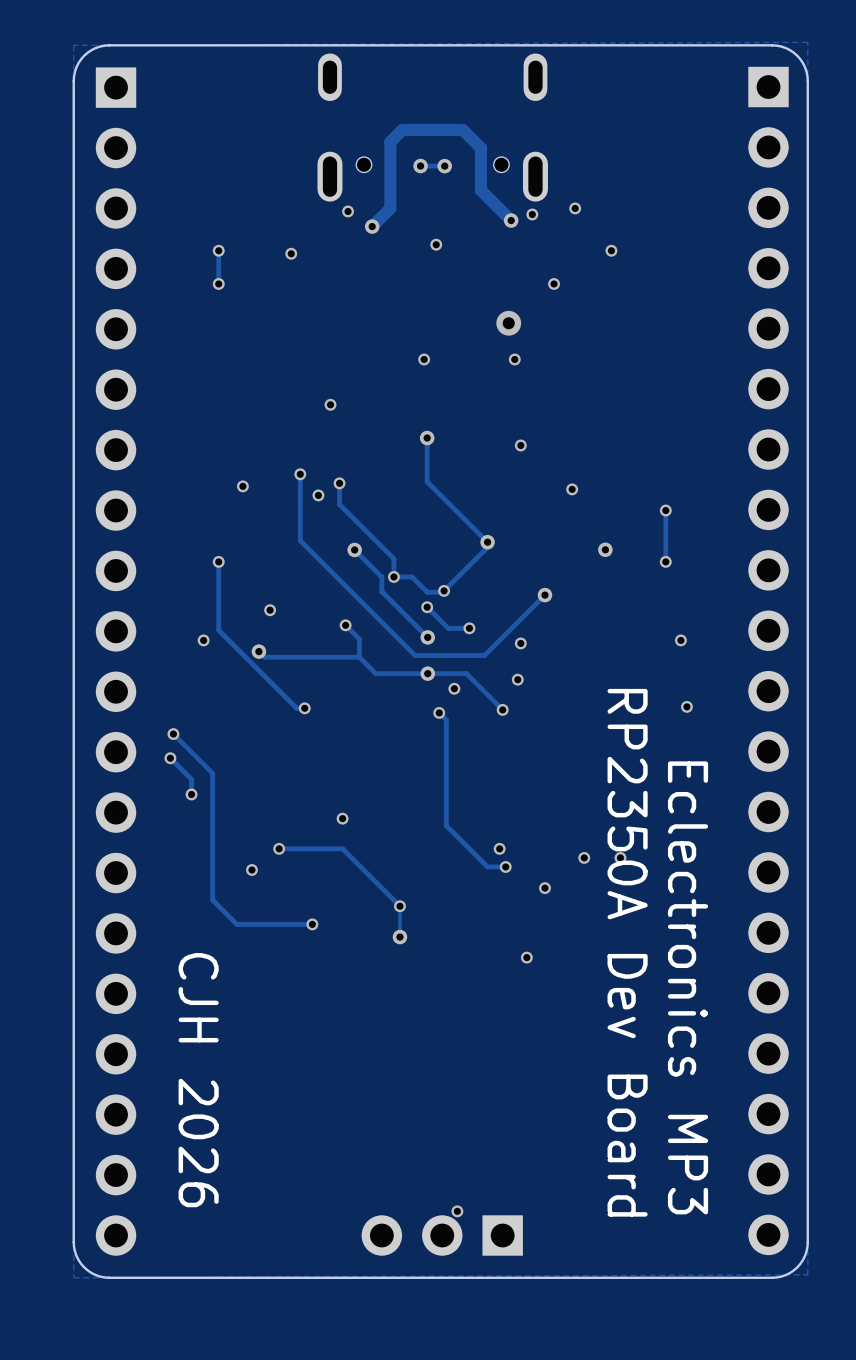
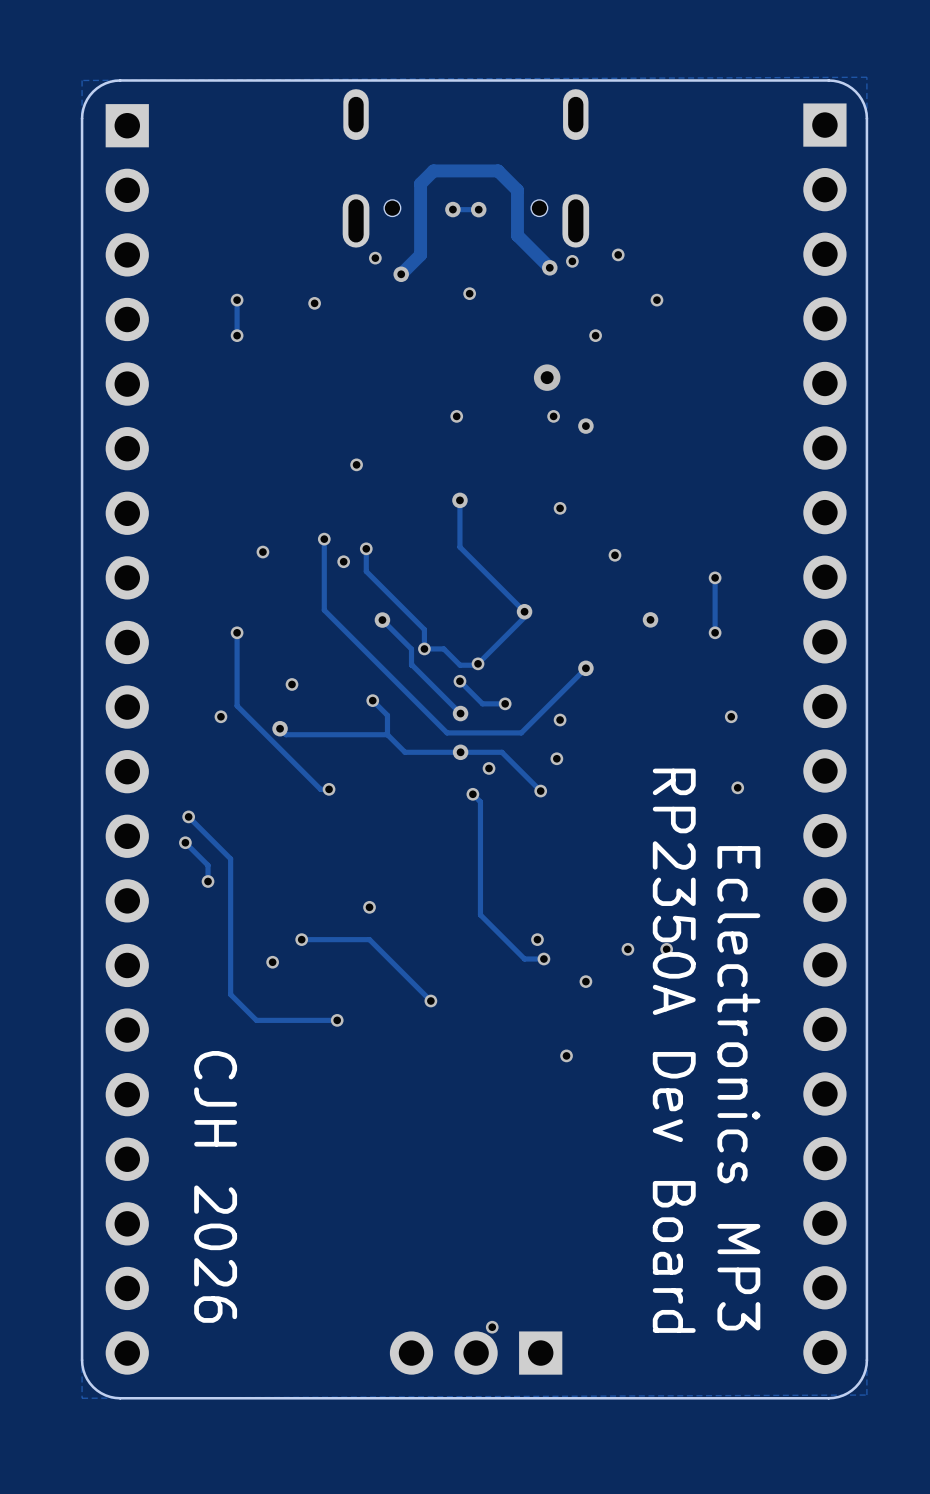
via: none -> (585, 426)
track: (399, 906) (399, 937) -> none
via: (399, 937) -> none

